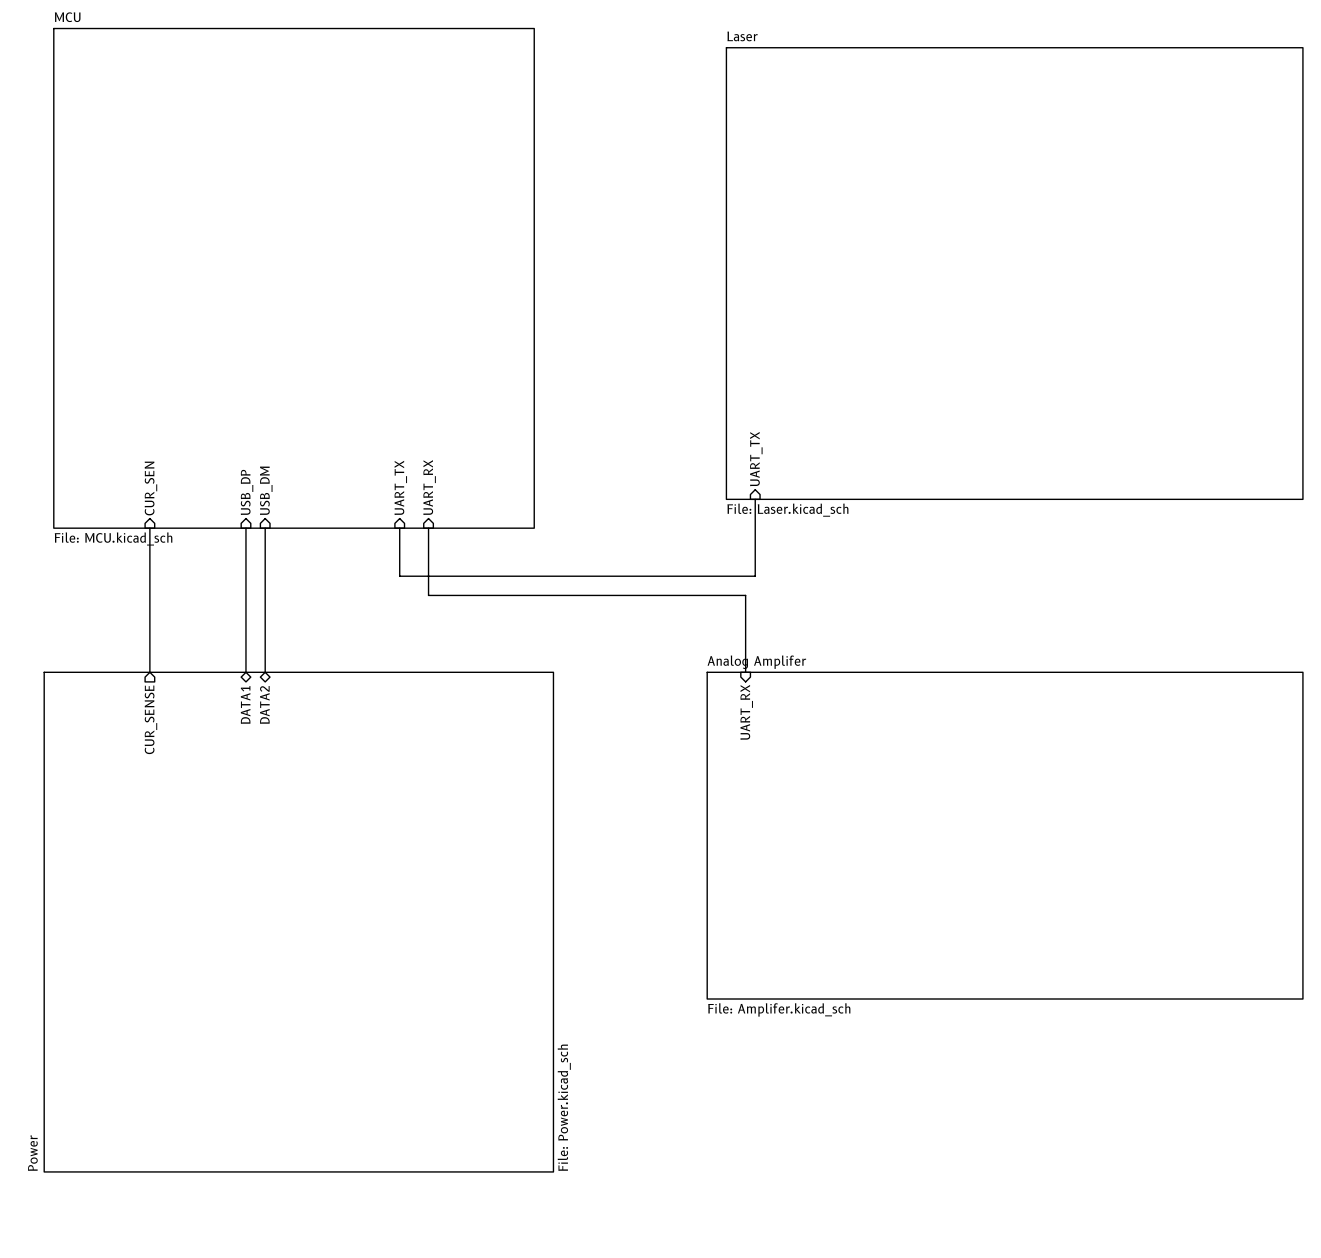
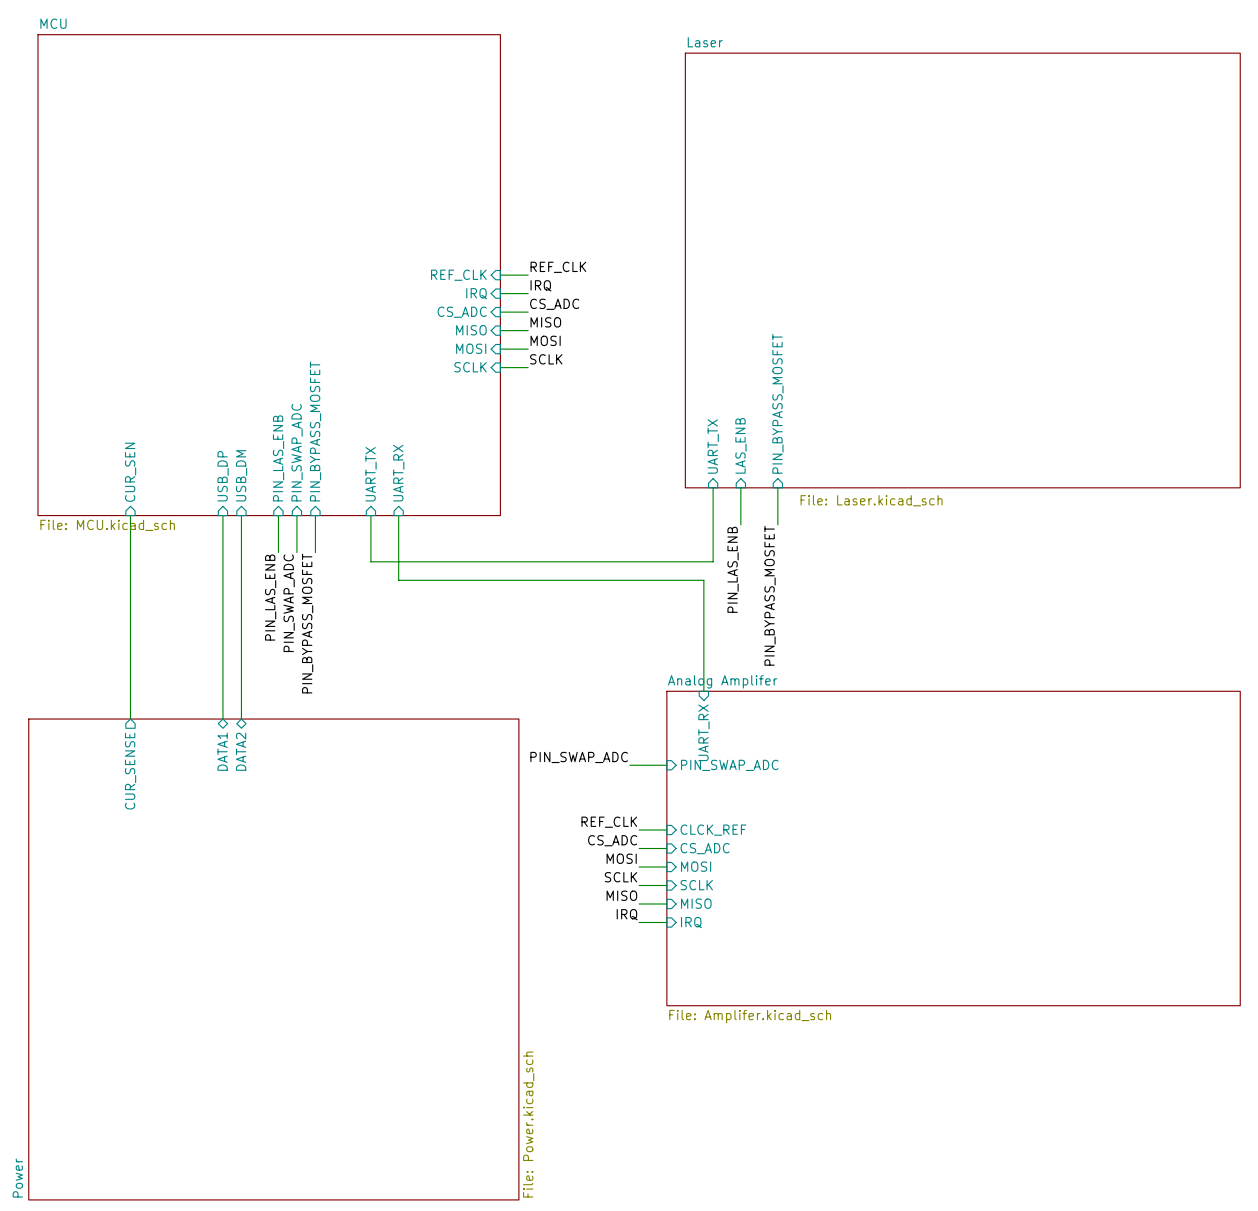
label: none -> REF_CLK (558, 267)
wire: none -> (500, 275) (528, 275)
sheet pin: none -> REF_CLK (458, 275)
label: none -> IRQ (540, 285)
sheet pin: none -> IRQ (476, 293)
wire: none -> (500, 293) (528, 293)
label: none -> CS_ADC (554, 304)
wire: none -> (500, 312) (528, 312)
sheet pin: none -> CS_ADC (462, 312)
label: none -> MISO (545, 322)
sheet pin: none -> MISO (471, 330)
wire: none -> (500, 330) (528, 330)
label: none -> MOSI (545, 340)
sheet pin: none -> MOSI (471, 348)
wire: none -> (500, 349) (528, 349)
label: none -> SCLK (546, 359)
sheet pin: none -> SCLK (470, 367)
wire: none -> (500, 367) (528, 367)
sheet pin: none -> PIN_BYPASS_MOSFET (777, 403)
sheet pin: none -> PIN_BYPASS_MOSFET (315, 431)
sheet pin: none -> LAS_ENB (740, 445)
sheet pin: none -> PIN_SWAP_ADC (297, 452)
sheet pin: none -> PIN_LAS_ENB (278, 458)
wire: none -> (740, 487) (740, 524)
wire: none -> (777, 487) (777, 524)
sheet Laser value position: File: Laser.kicad_sch (787, 510) -> File: Laser.kicad_sch (871, 500)
wire: none -> (278, 515) (278, 552)
wire: none -> (296, 515) (296, 552)
wire: none -> (315, 515) (315, 552)
label: none -> PIN_LAS_ENB (733, 569)
label: none -> PIN_BYPASS_MOSFET (770, 595)
label: none -> PIN_LAS_ENB (270, 597)
label: none -> PIN_SWAP_ADC (289, 603)
label: none -> PIN_BYPASS_MOSFET (307, 623)
wire: none -> (130, 654) (130, 719)
wire: none -> (222, 654) (222, 719)
wire: none -> (241, 654) (241, 719)
wire: none -> (703, 654) (703, 691)
sheet pin position: DATA1 (245, 704) -> DATA1 (222, 751)
sheet pin position: DATA2 (264, 704) -> DATA2 (241, 751)
sheet pin position: UART_RX (746, 712) -> UART_RX (703, 732)
sheet pin position: CUR_SENSE (150, 719) -> CUR_SENSE (130, 771)
label: none -> PIN_SWAP_ADC (579, 757)
wire: none -> (629, 765) (666, 765)
sheet pin: none -> PIN_SWAP_ADC (729, 765)
sheet Analog Amplifer position: (1005, 835) -> (953, 848)
label: none -> REF_CLK (609, 822)
wire: none -> (639, 830) (666, 830)
sheet pin: none -> CLCK_REF (713, 830)
label: none -> CS_ADC (612, 840)
wire: none -> (639, 848) (666, 848)
sheet pin: none -> CS_ADC (705, 848)
label: none -> MOSI (621, 858)
wire: none -> (639, 867) (666, 867)
sheet pin: none -> MOSI (696, 866)
label: none -> SCLK (620, 877)
wire: none -> (639, 885) (666, 885)
sheet pin: none -> SCLK (696, 885)
sheet Power position: (298, 922) -> (273, 959)
label: none -> MISO (621, 895)
wire: none -> (639, 903) (666, 903)
sheet pin: none -> MISO (696, 903)
label: none -> IRQ (627, 914)
wire: none -> (639, 922) (666, 922)
sheet pin: none -> IRQ (691, 922)

